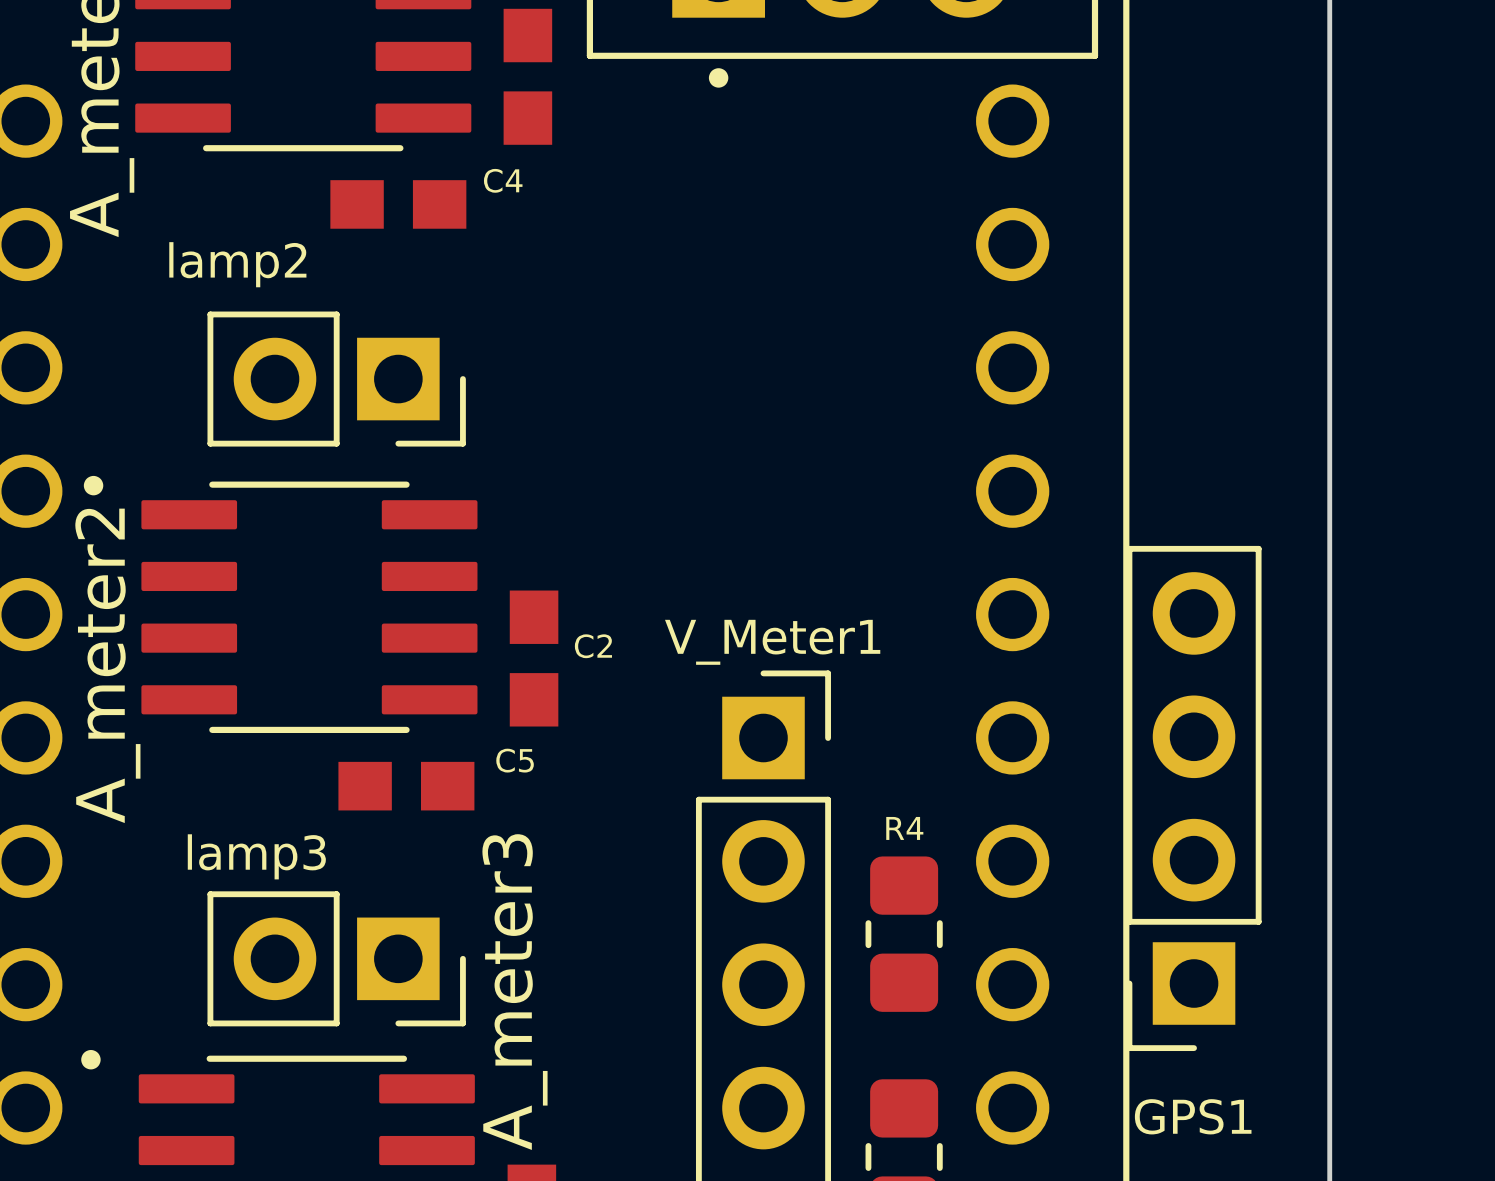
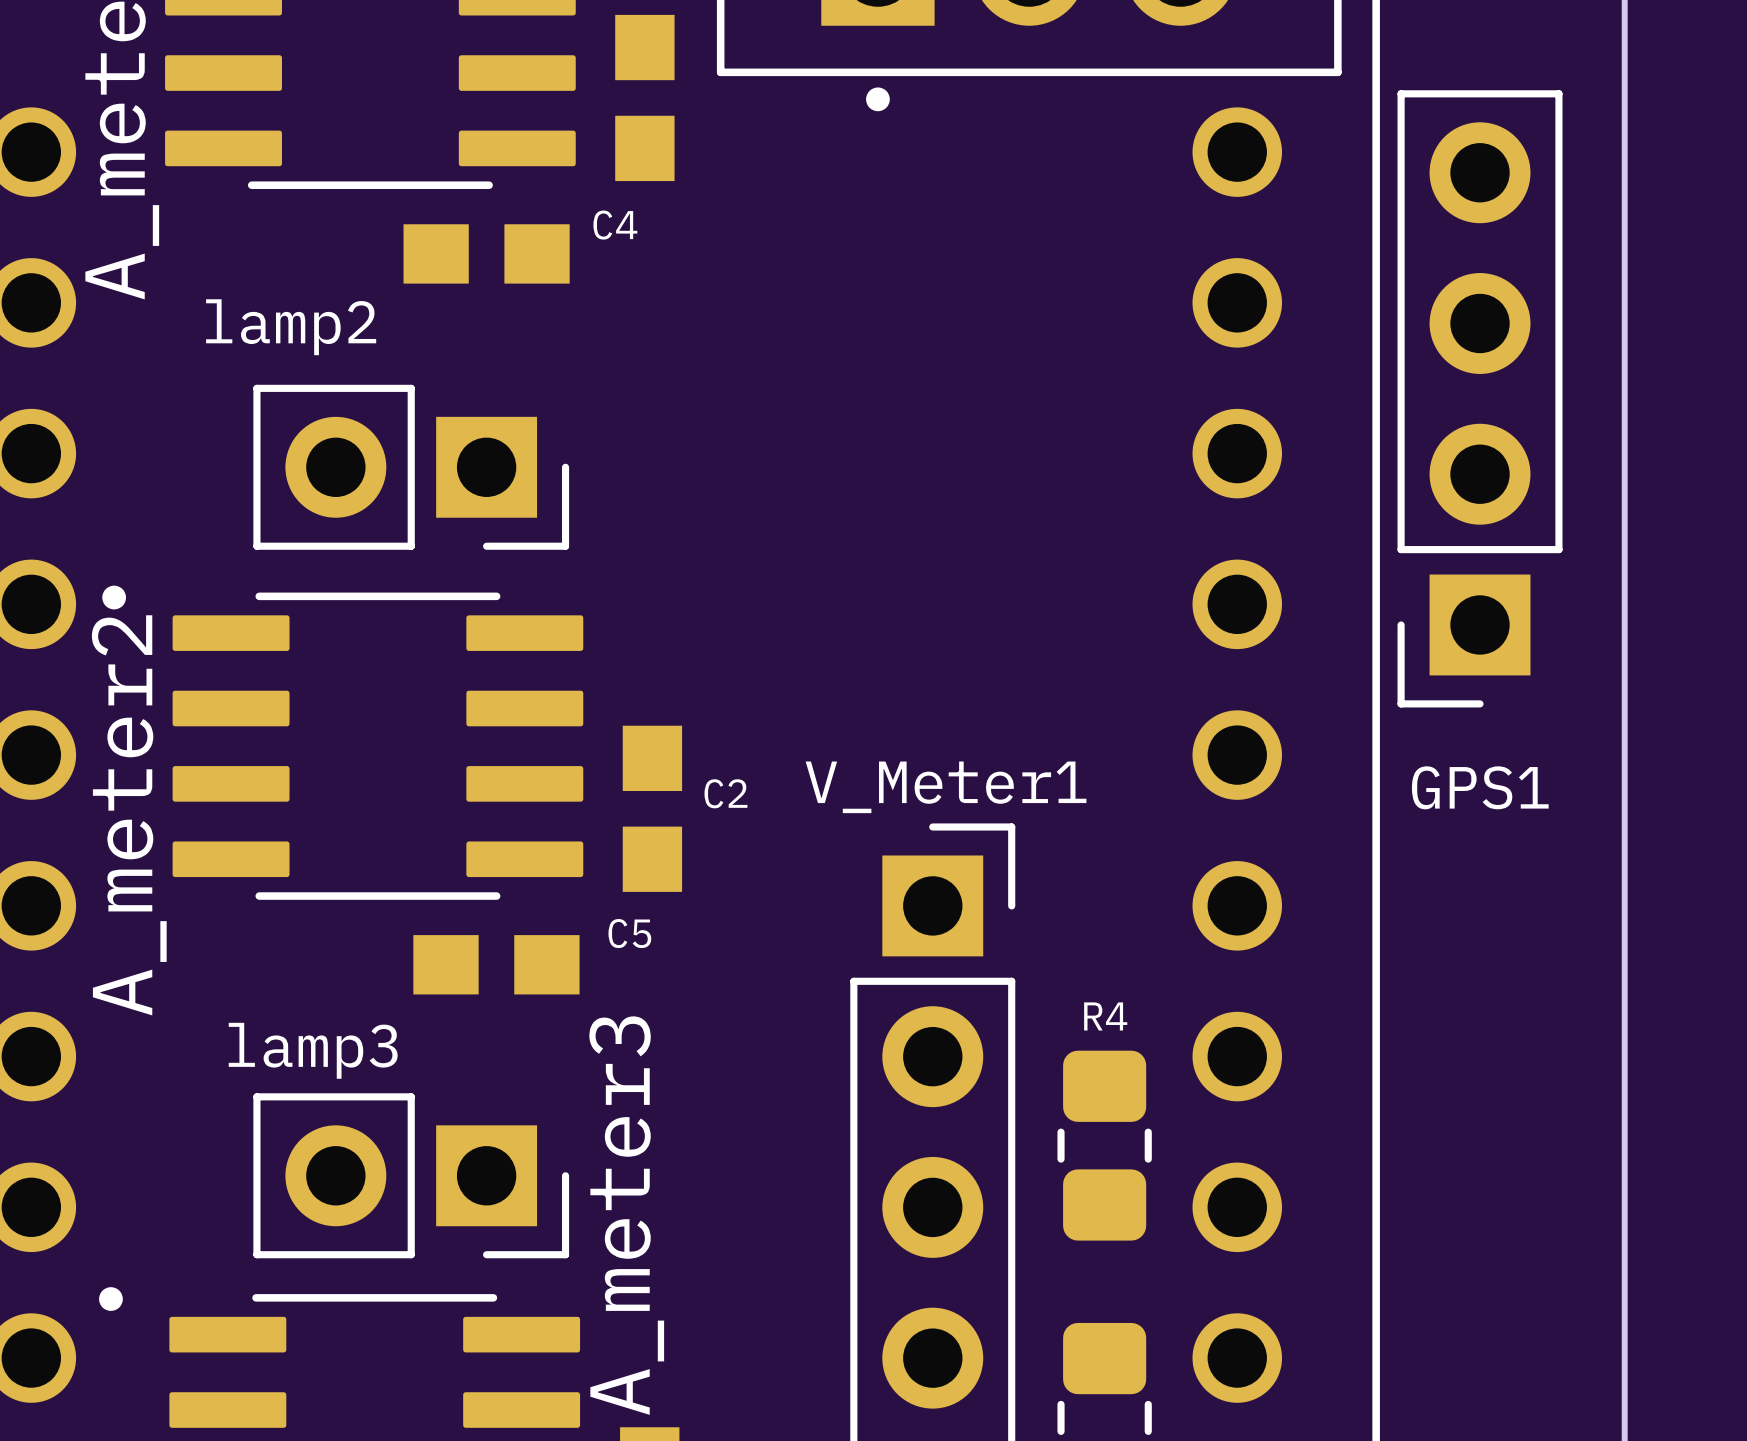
GPS1 position: (1194, 798) -> (1480, 398)

